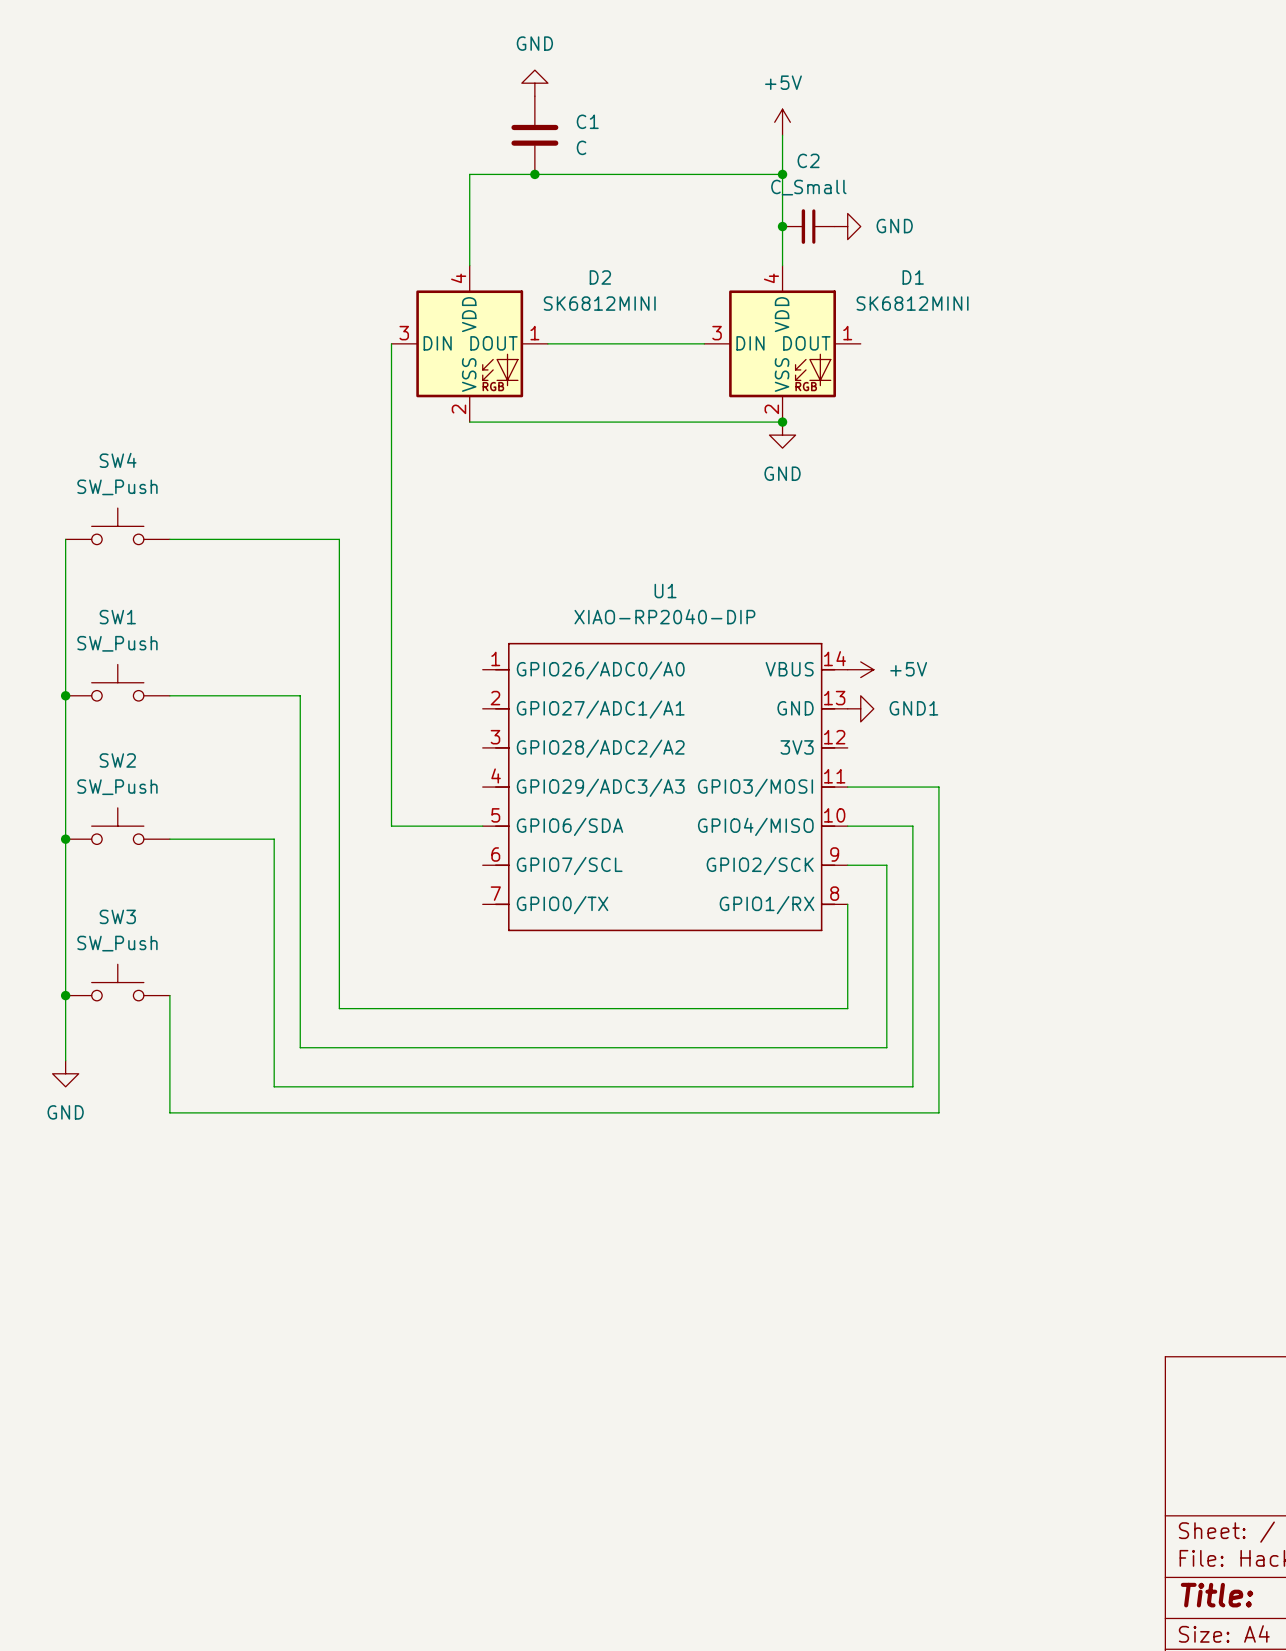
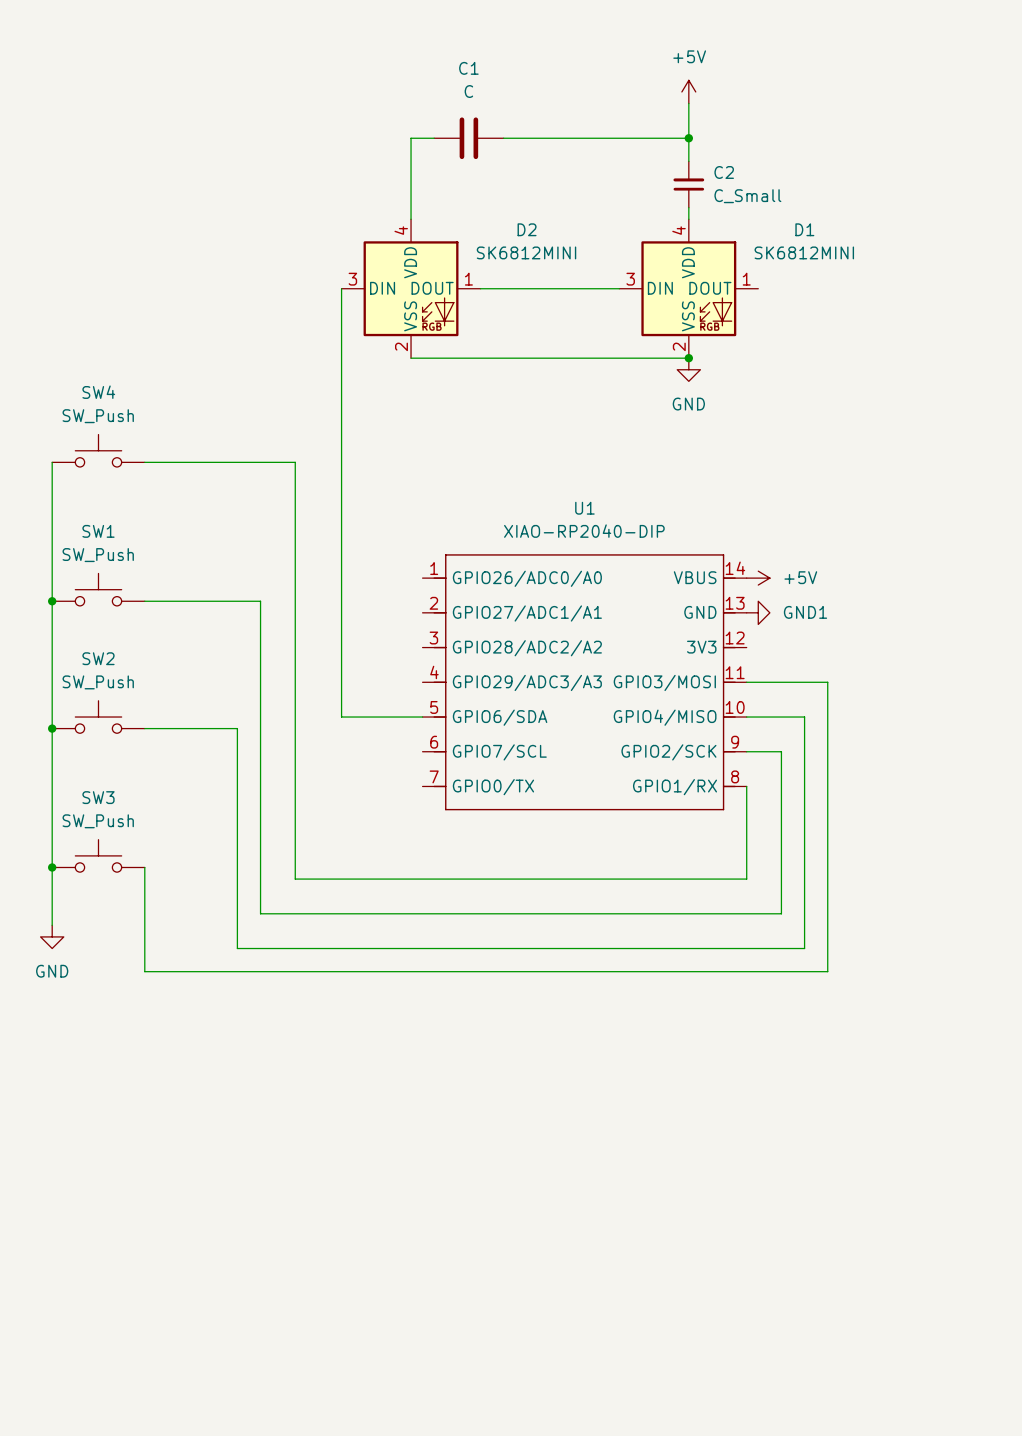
power symbol: GND (534, 83) -> none
C1 name position: C1 (587, 121) -> C1 (468, 68)
C1 rotation: 0° (534, 135) -> 90° clockwise (468, 138)
C1 value position: C (581, 147) -> C (468, 91)
C2 name position: C2 (808, 160) -> C2 (724, 172)
junction: (534, 174) -> none
C2 value position: C_Small (808, 187) -> C_Small (747, 196)
junction: (782, 226) -> none
C2 rotation: 0° (808, 226) -> 90° clockwise (688, 184)
power symbol: GND (847, 226) -> none

